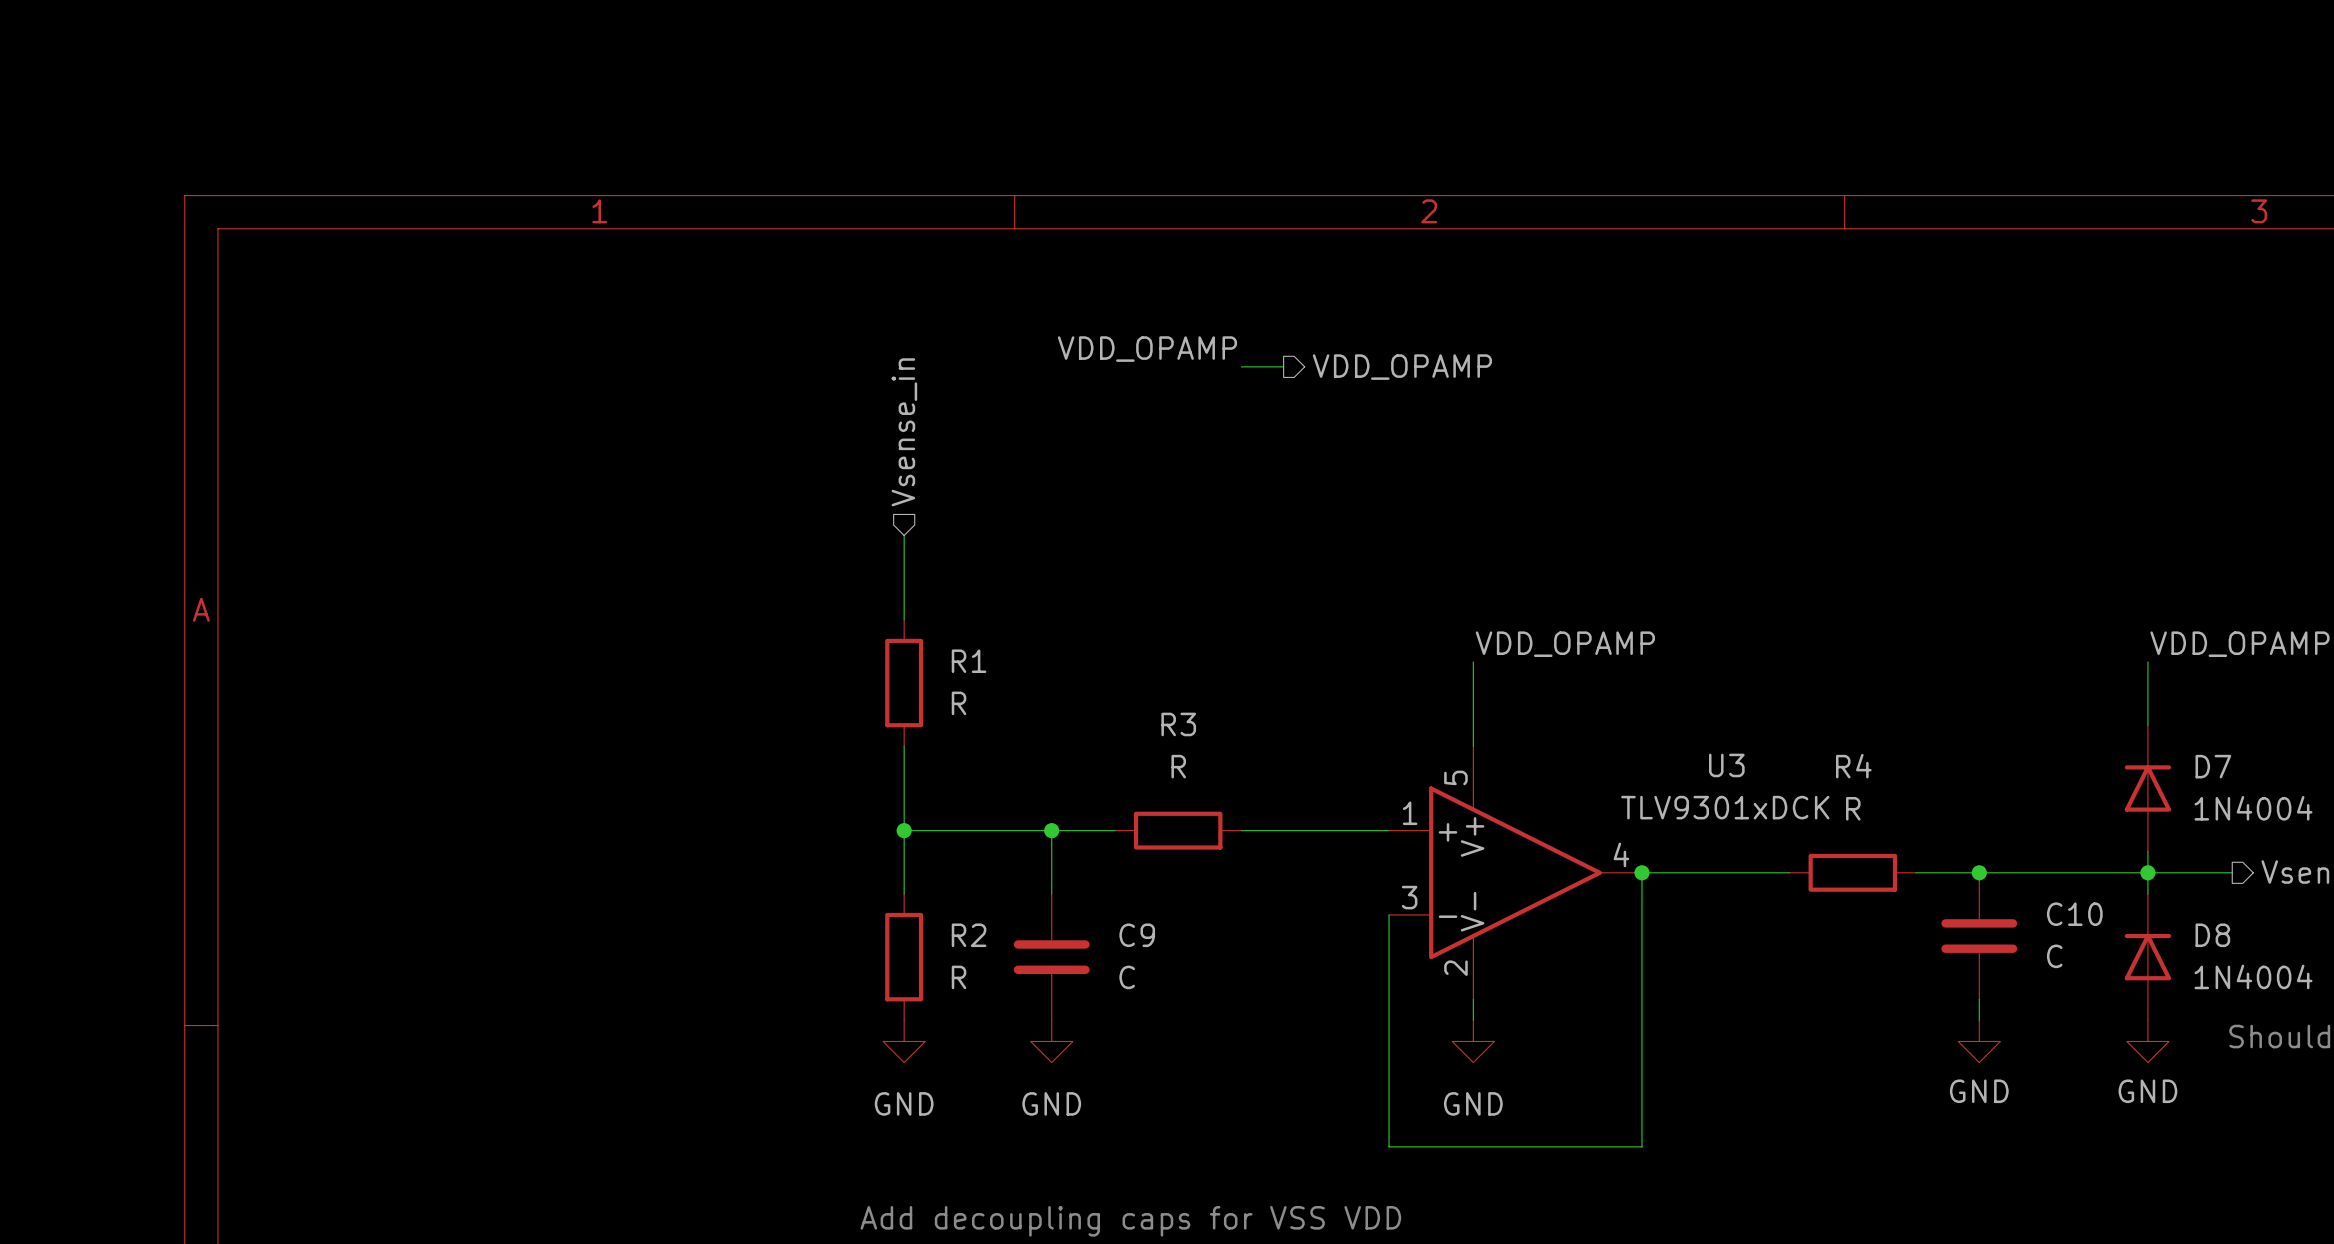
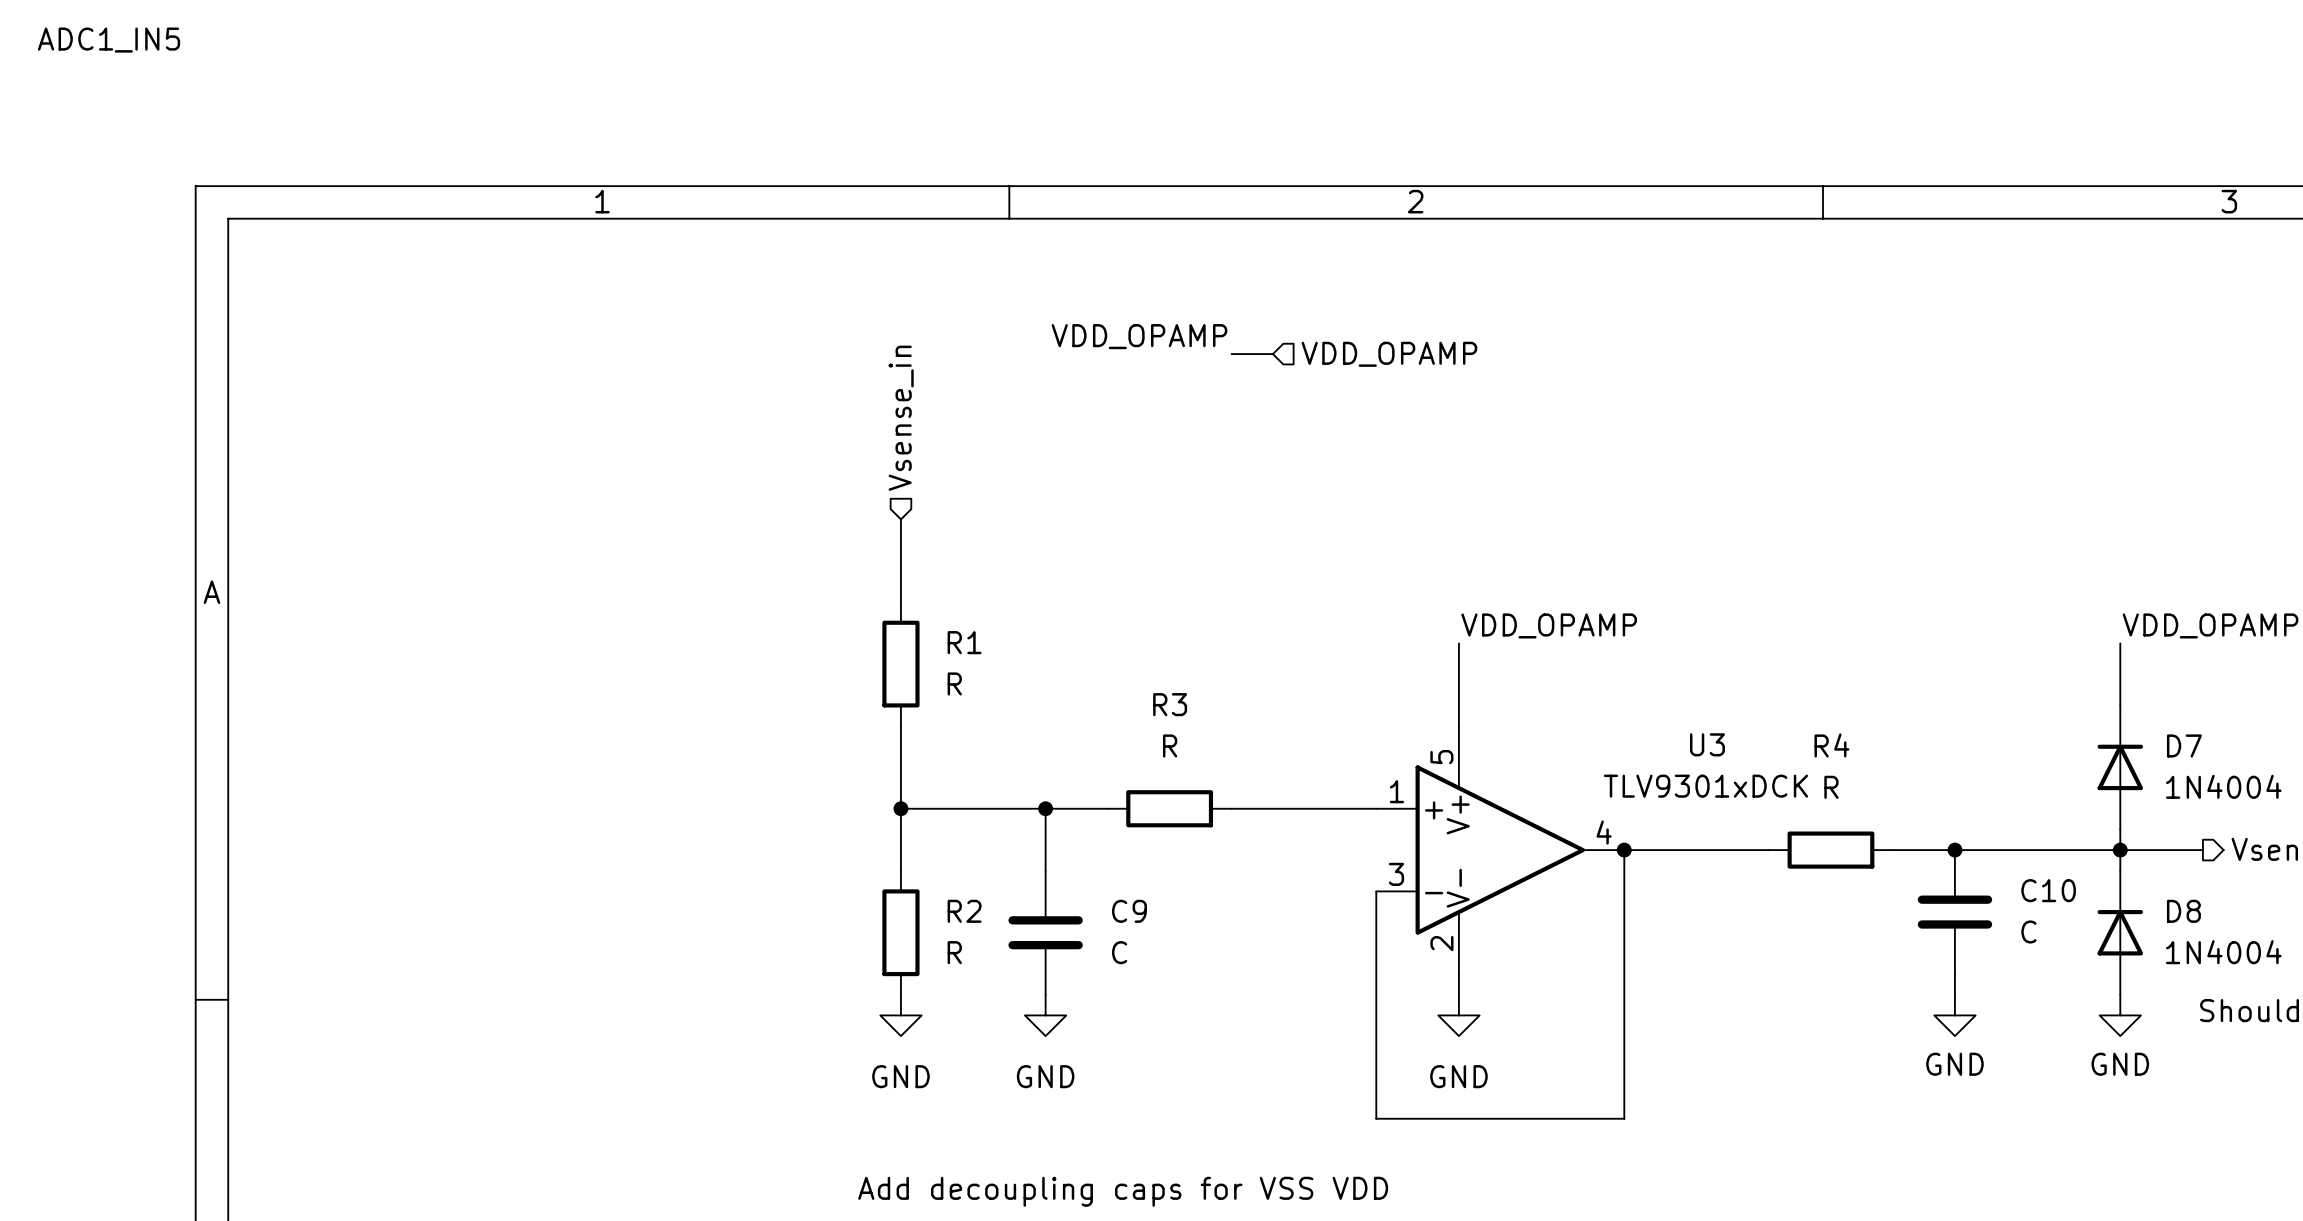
label: none -> ADC1_IN5 (109, 40)
hierarchical label shape: output (1402, 367) -> input (1389, 354)

